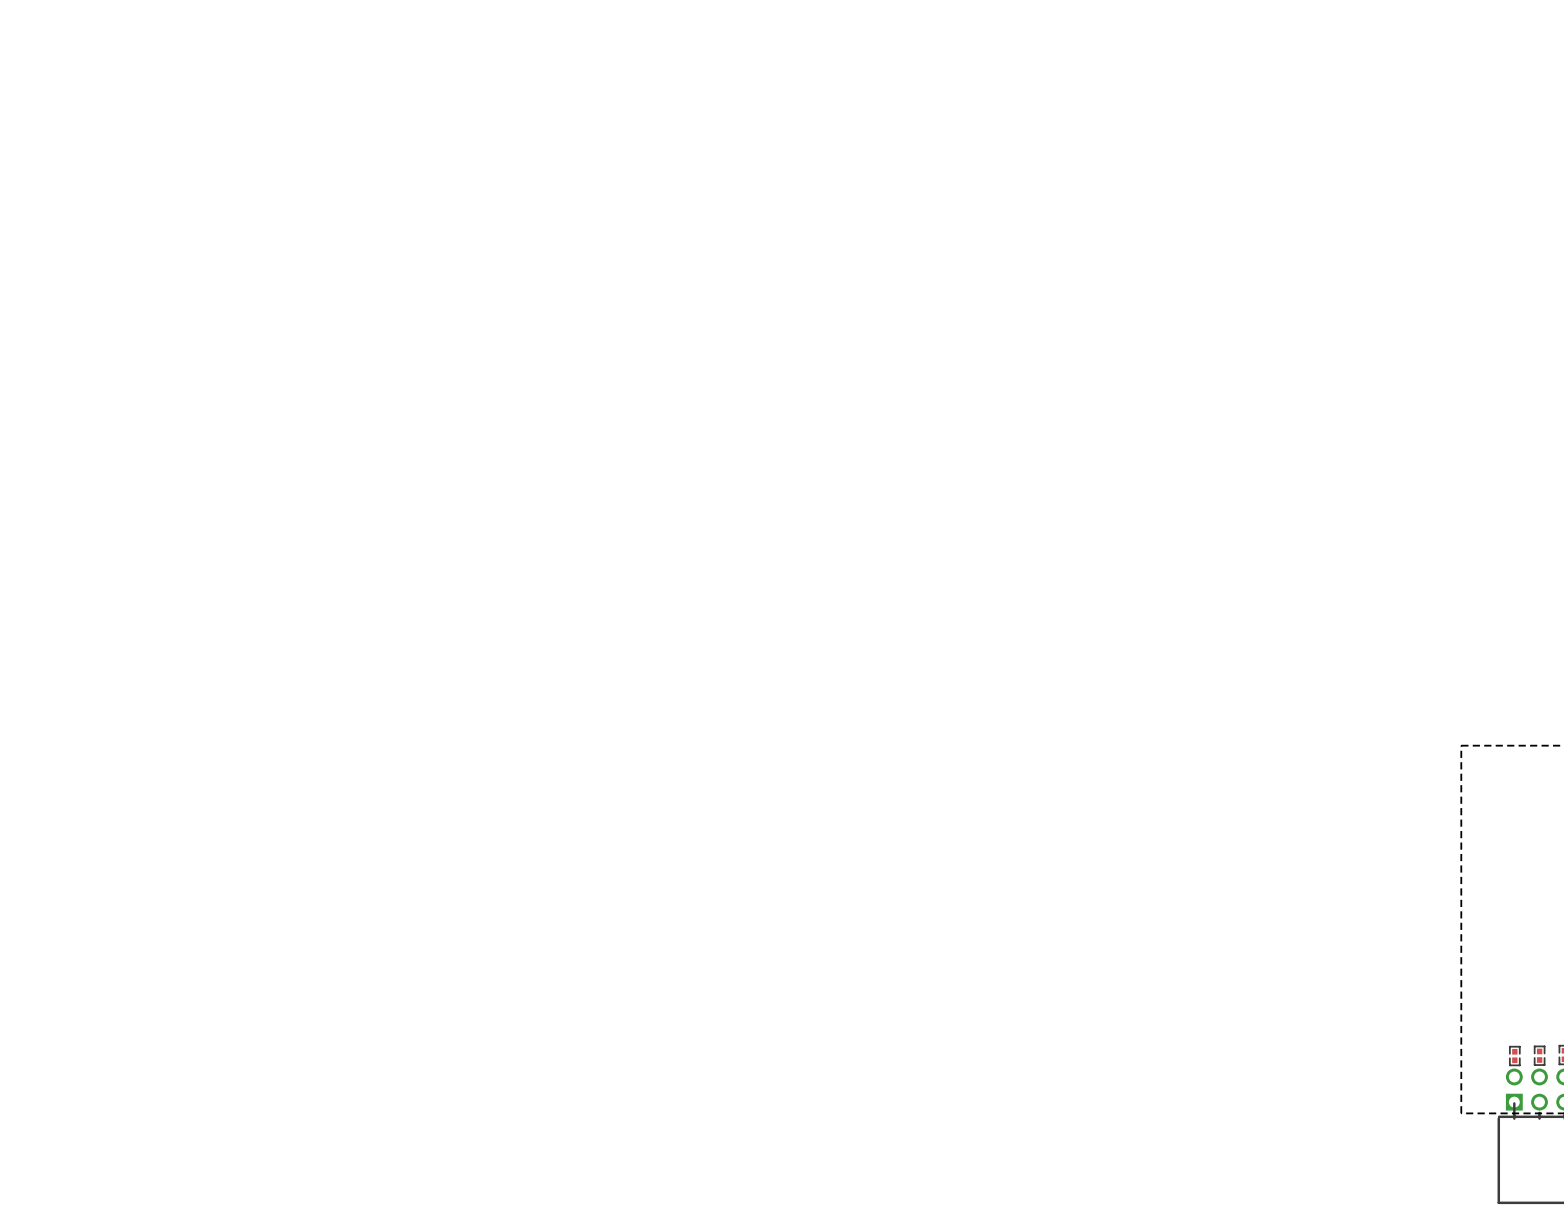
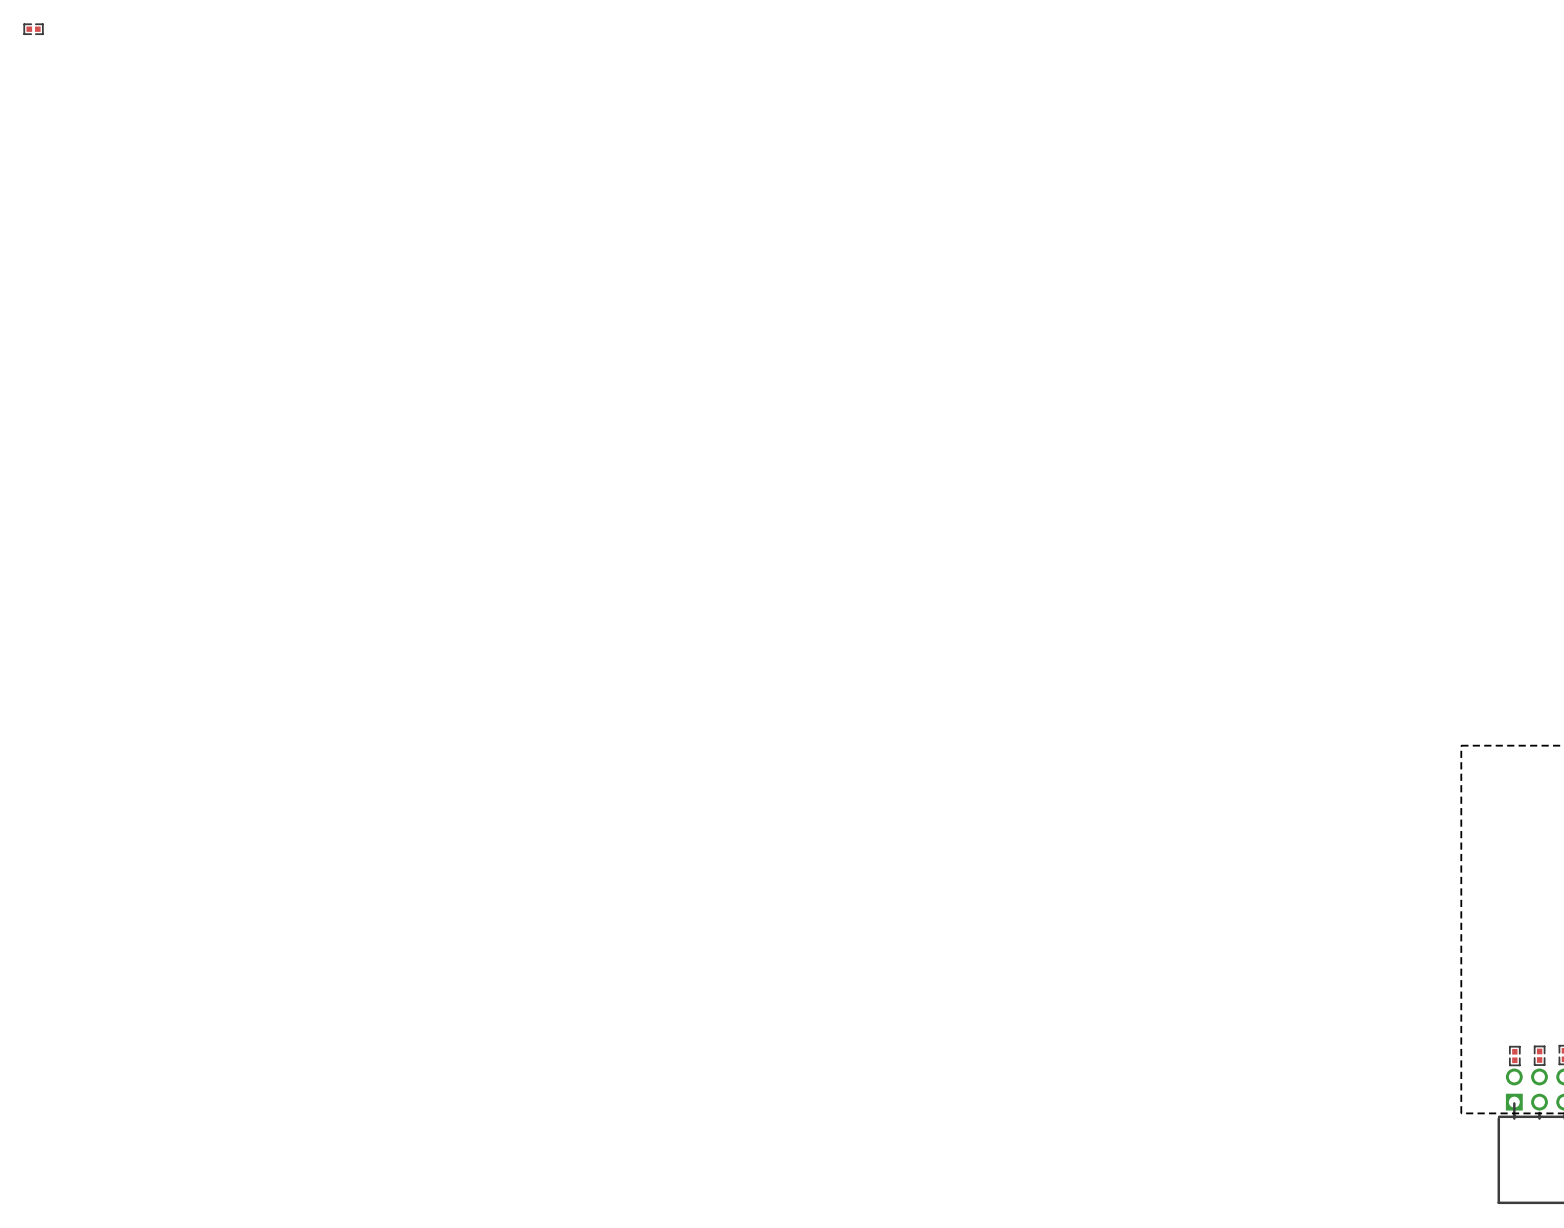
part: none -> (33, 29)

